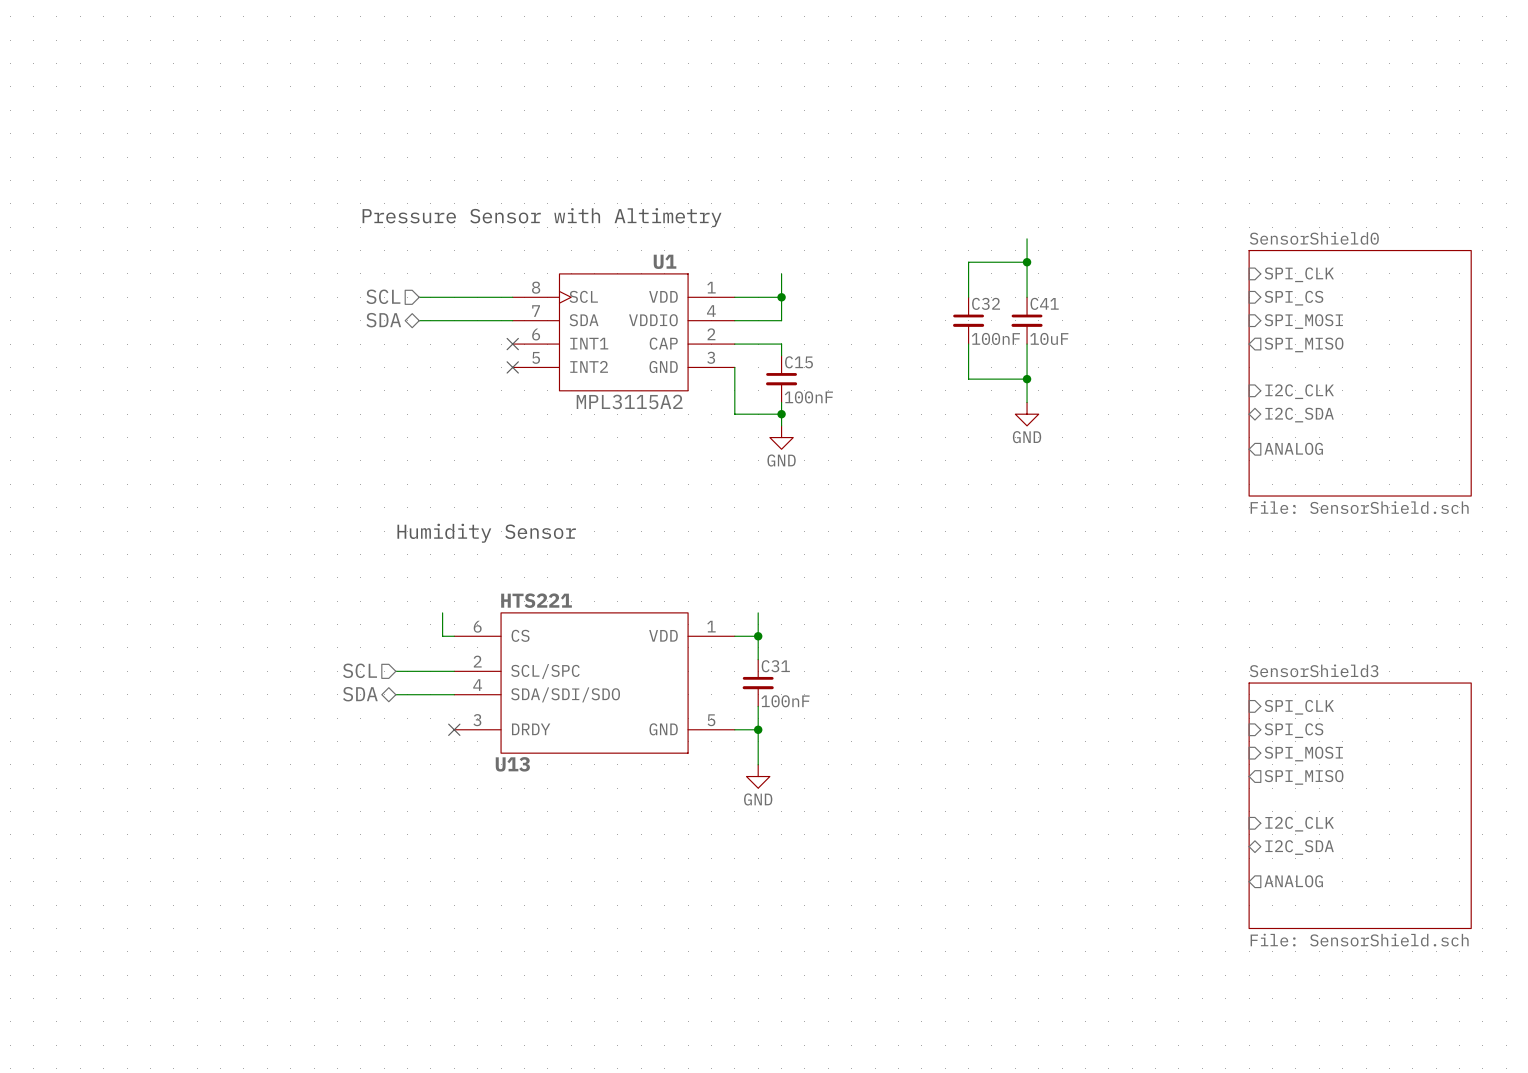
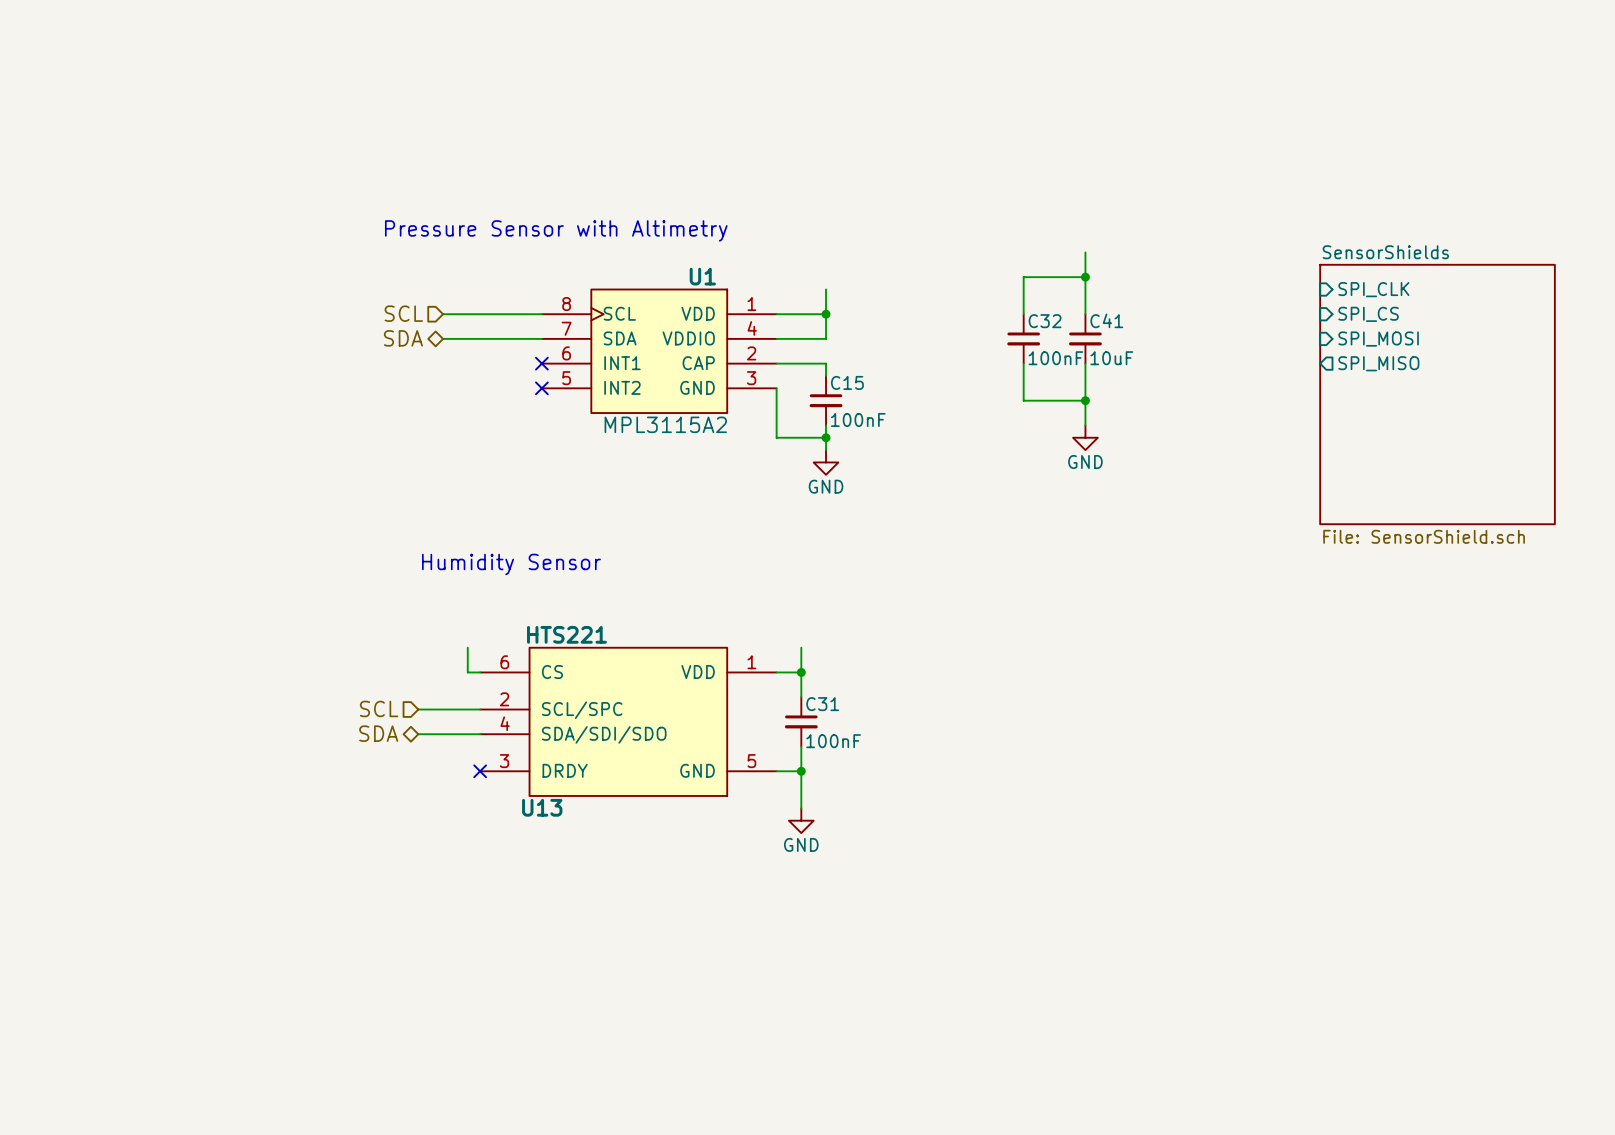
sheet SensorShield0 name: SensorShield0 (1314, 238) -> SensorShields (1385, 252)
sheet pin: I2C_CLK (1299, 391) -> none
sheet pin: I2C_SDA (1299, 415) -> none
sheet pin: ANALOG (1293, 448) -> none
sheet pin: SPI_CLK (1299, 707) -> none
sheet pin: SPI_CS (1293, 730) -> none
sheet pin: SPI_MOSI (1303, 754) -> none
sheet pin: SPI_MISO (1304, 777) -> none
sheet SensorShield3: File: SensorShield.sch (1360, 805) -> none
sheet pin: I2C_CLK (1299, 824) -> none
sheet pin: I2C_SDA (1299, 847) -> none
sheet pin: ANALOG (1293, 881) -> none

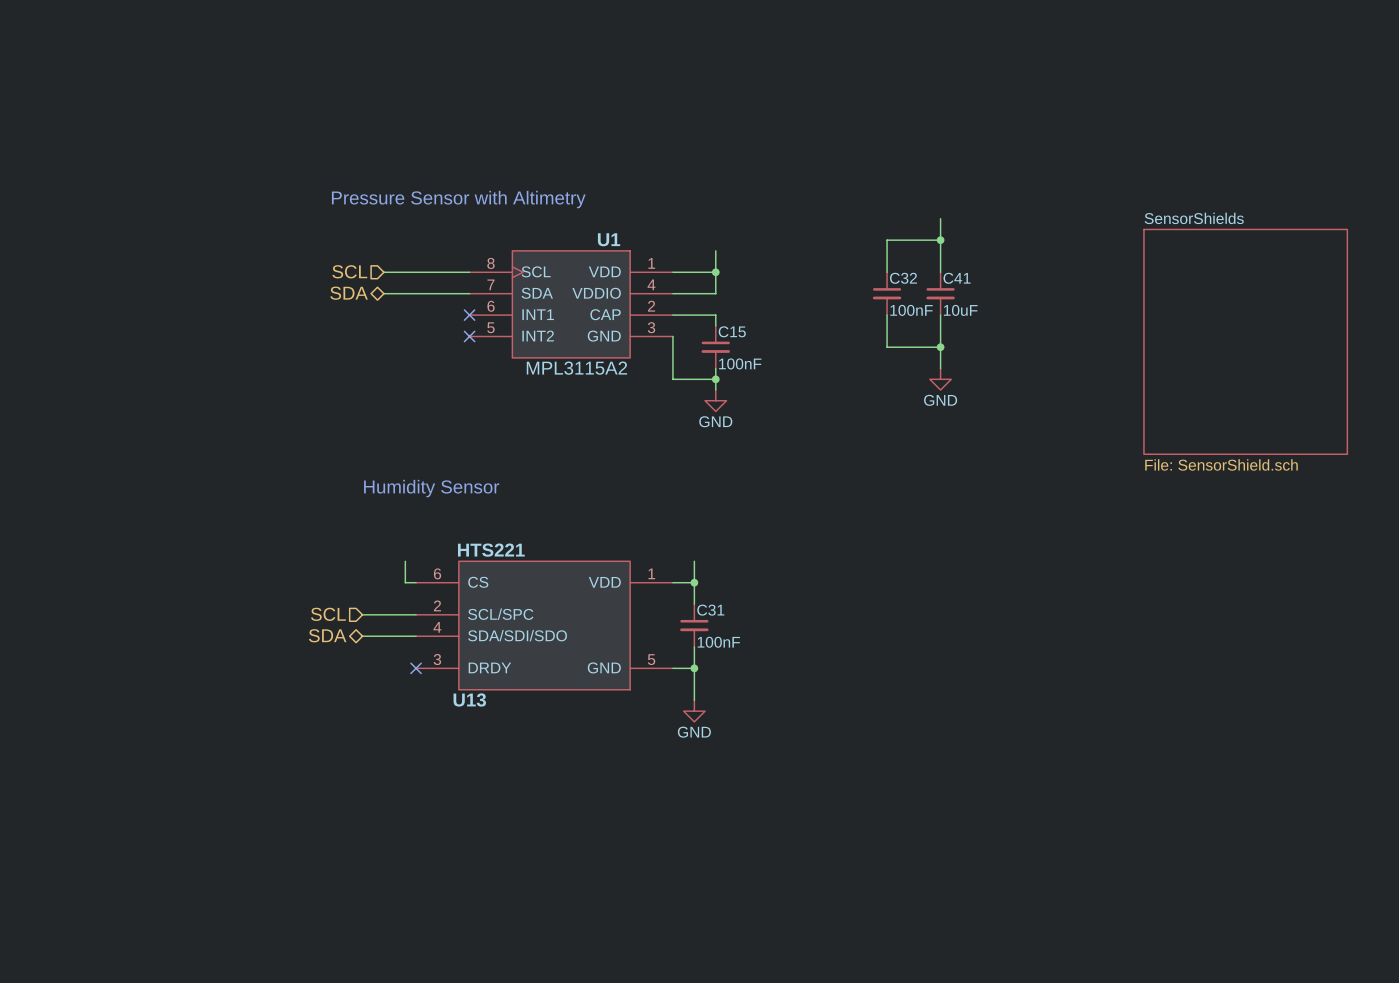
sheet pin: SPI_CLK (1373, 289) -> none
sheet pin: SPI_CS (1368, 314) -> none
sheet pin: SPI_MOSI (1378, 339) -> none
sheet pin: SPI_MISO (1378, 363) -> none

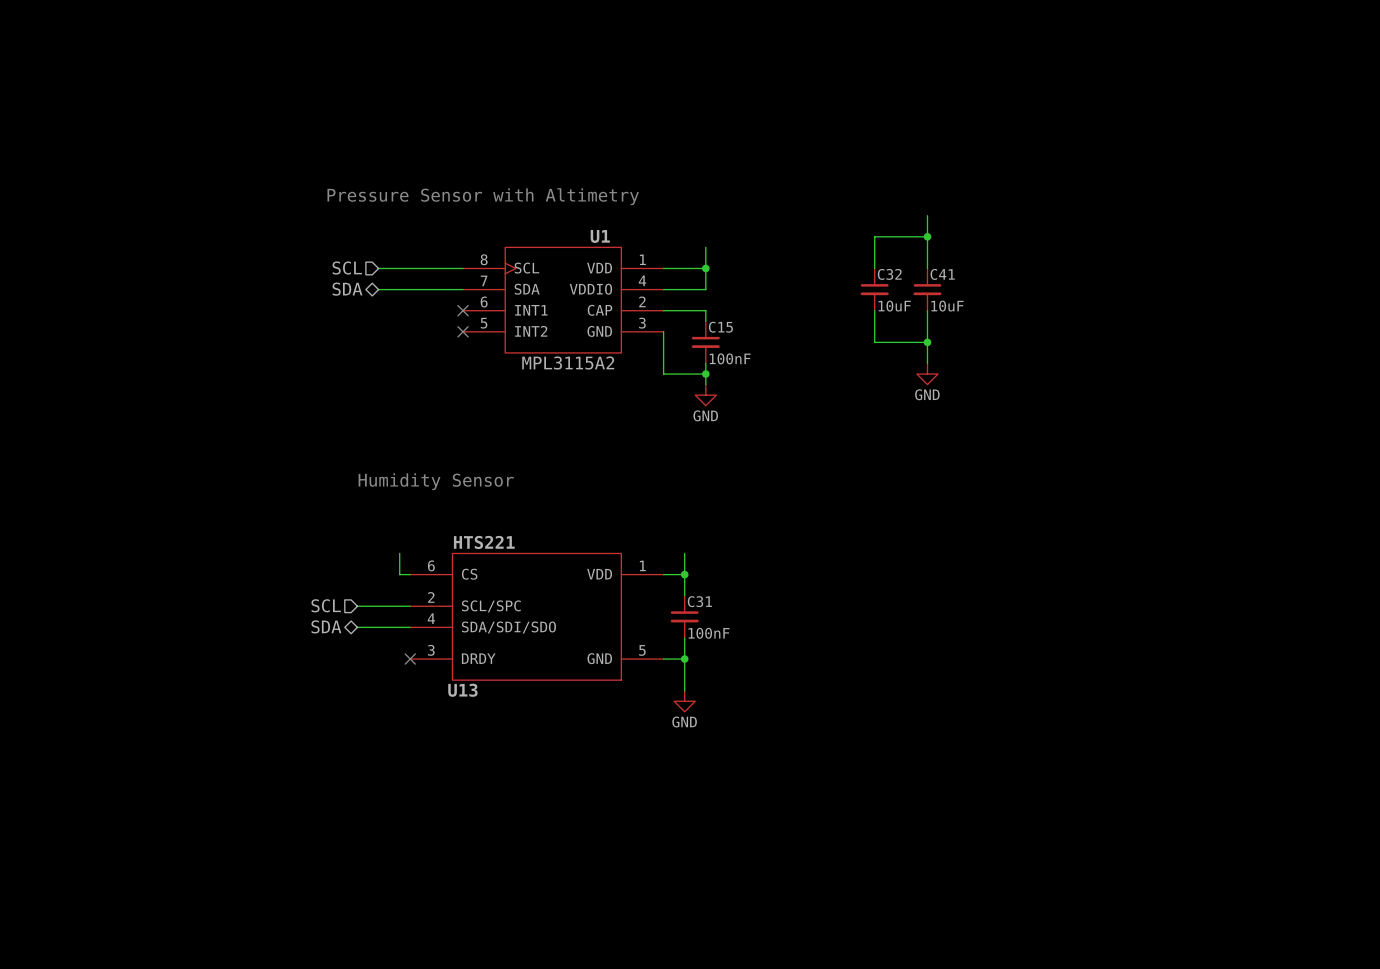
C32 value: 100nF (911, 310) -> 10uF (894, 306)
sheet SensorShields: File: SensorShield.sch (1245, 341) -> none

